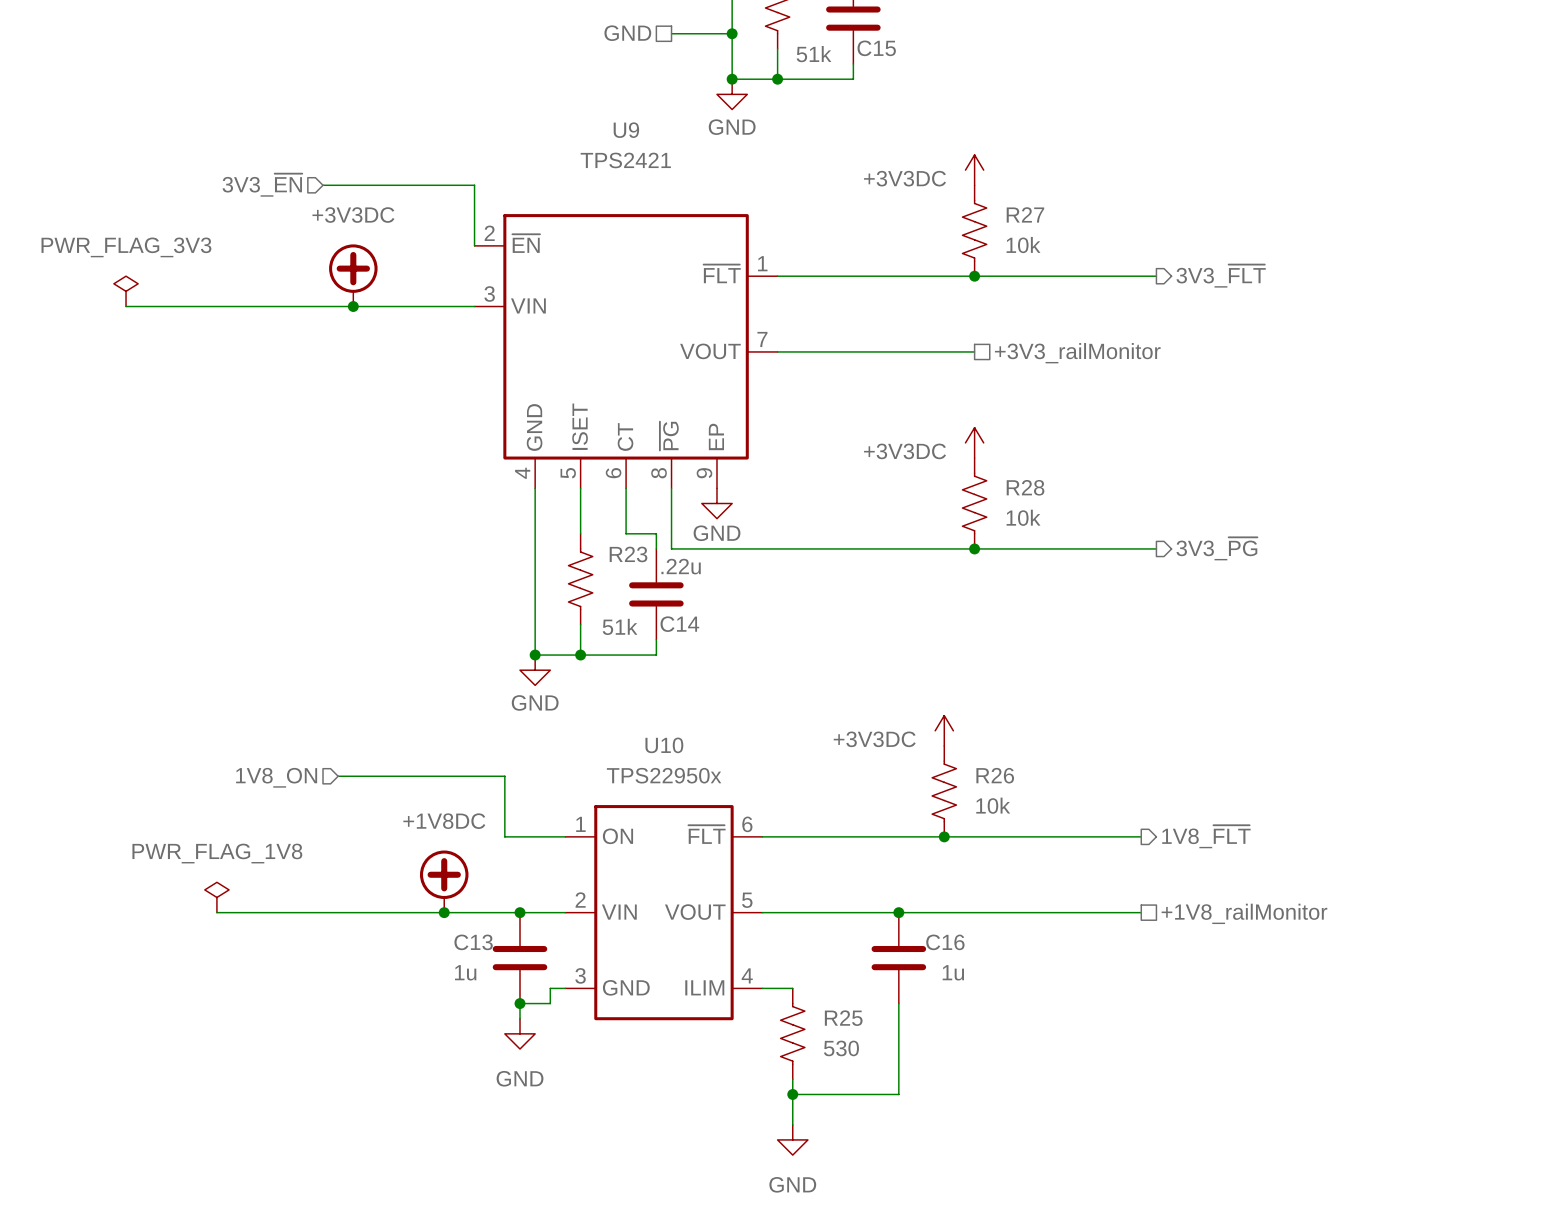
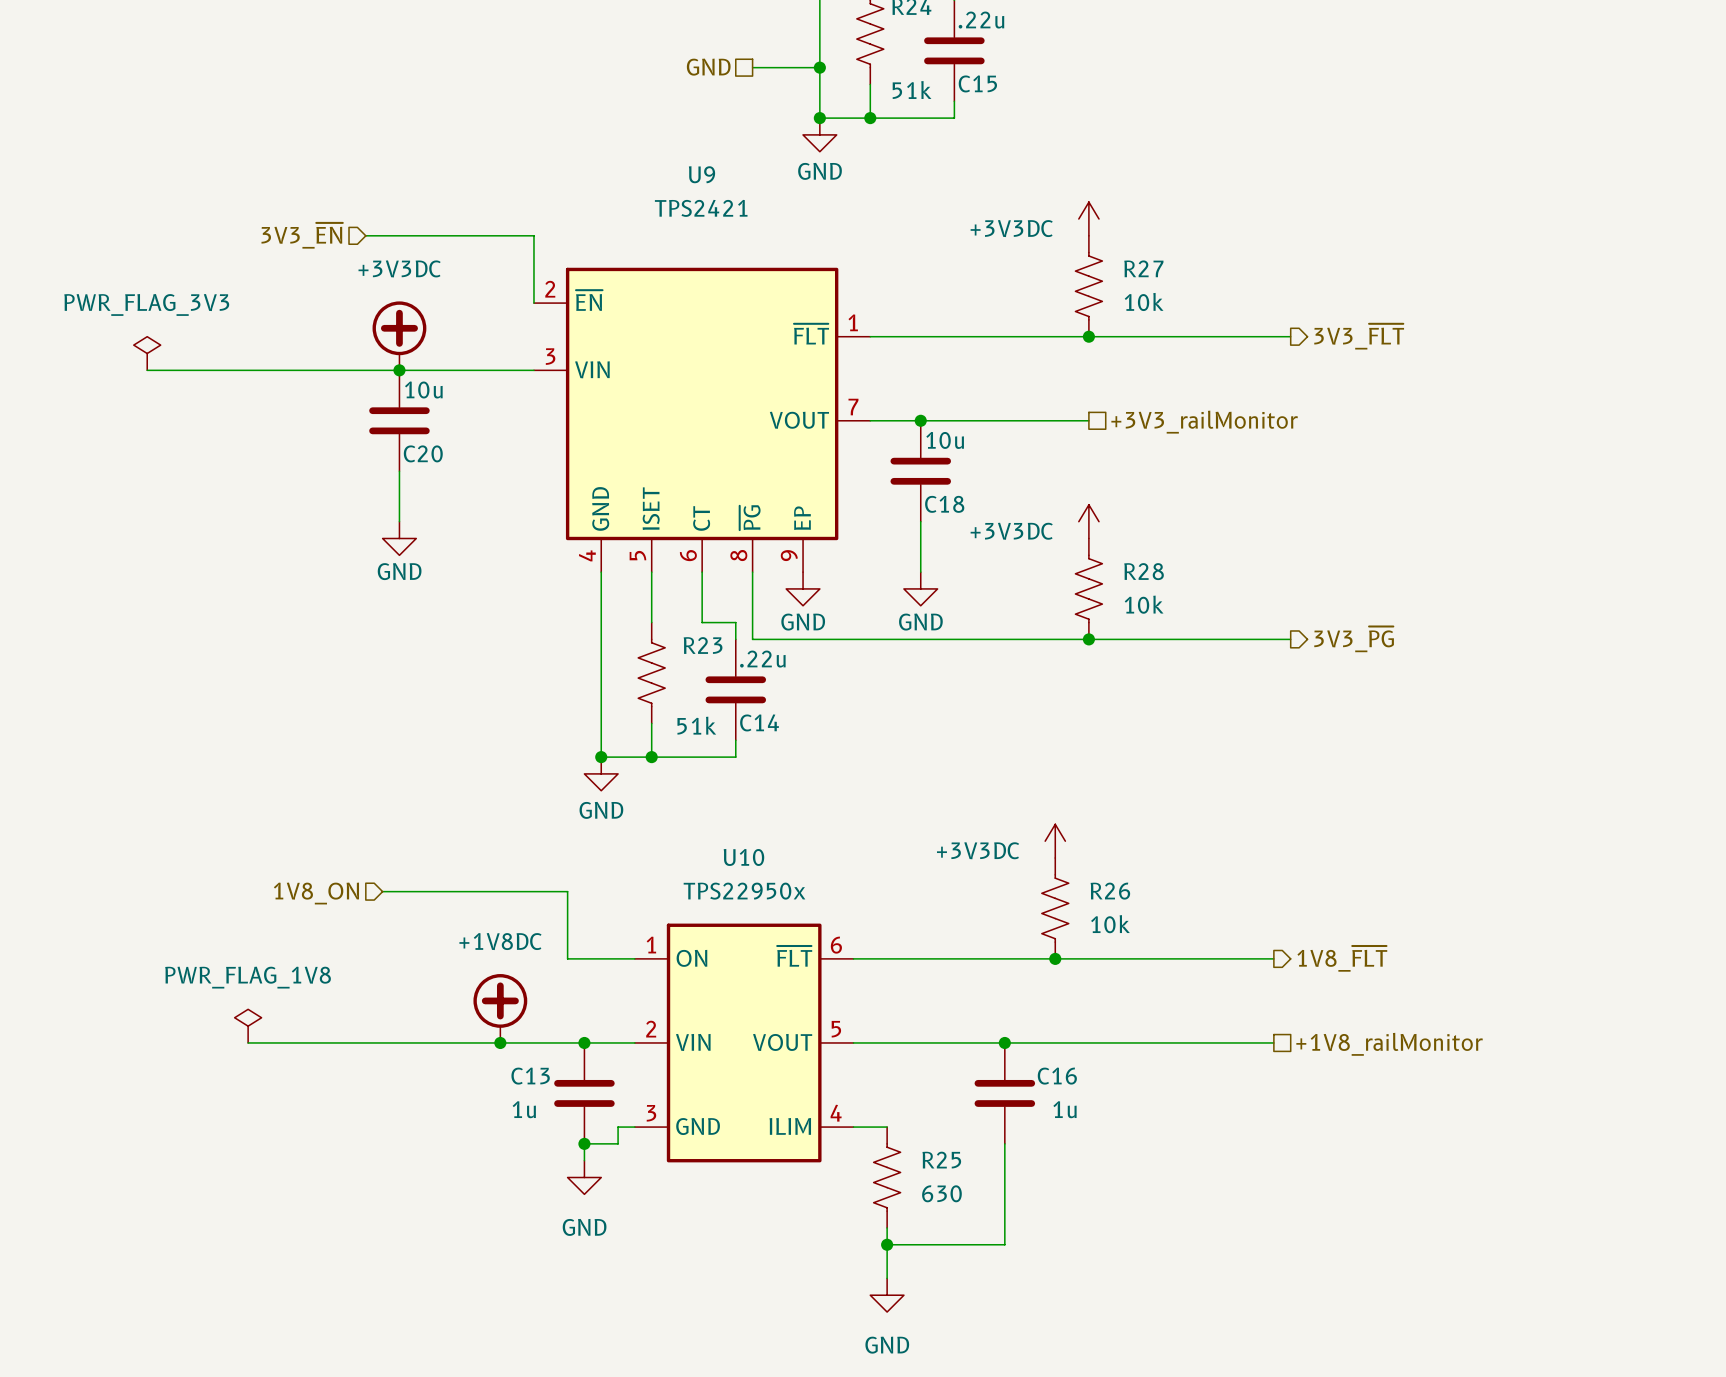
C20: none -> 10u (399, 420)
junction: none -> (920, 420)
wire: none -> (399, 471) (399, 521)
C18: none -> 10u (920, 471)
wire: none -> (920, 521) (920, 572)
power symbol: none -> GND (399, 538)
power symbol: none -> GND (920, 588)
R25 value: 530 (841, 1048) -> 630 (941, 1193)

